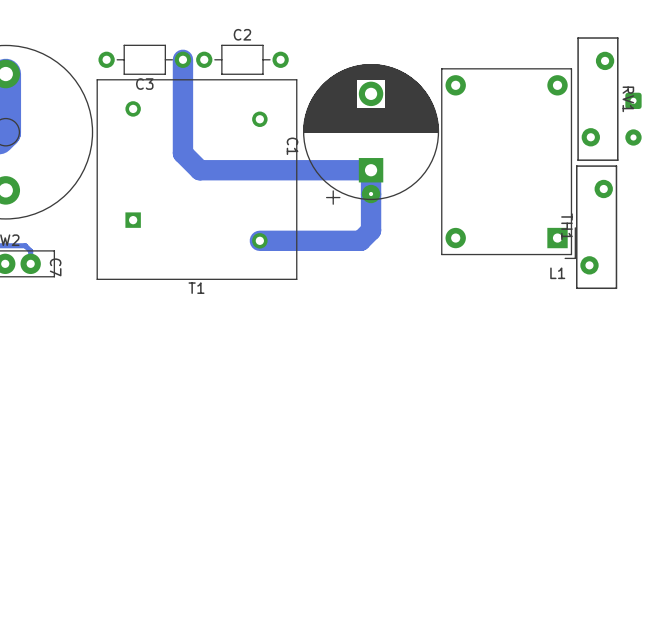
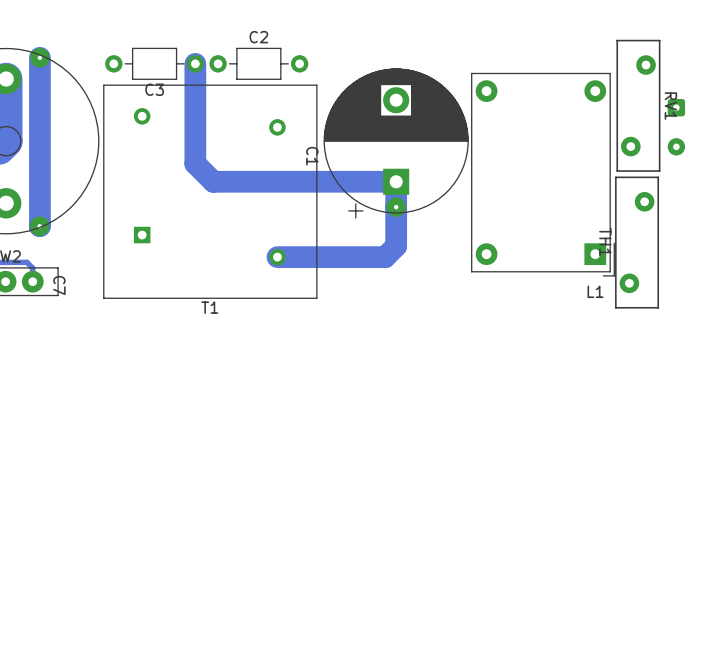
track: none -> (39, 57) (39, 226)
via: none -> (39, 57)
via: none -> (39, 226)

